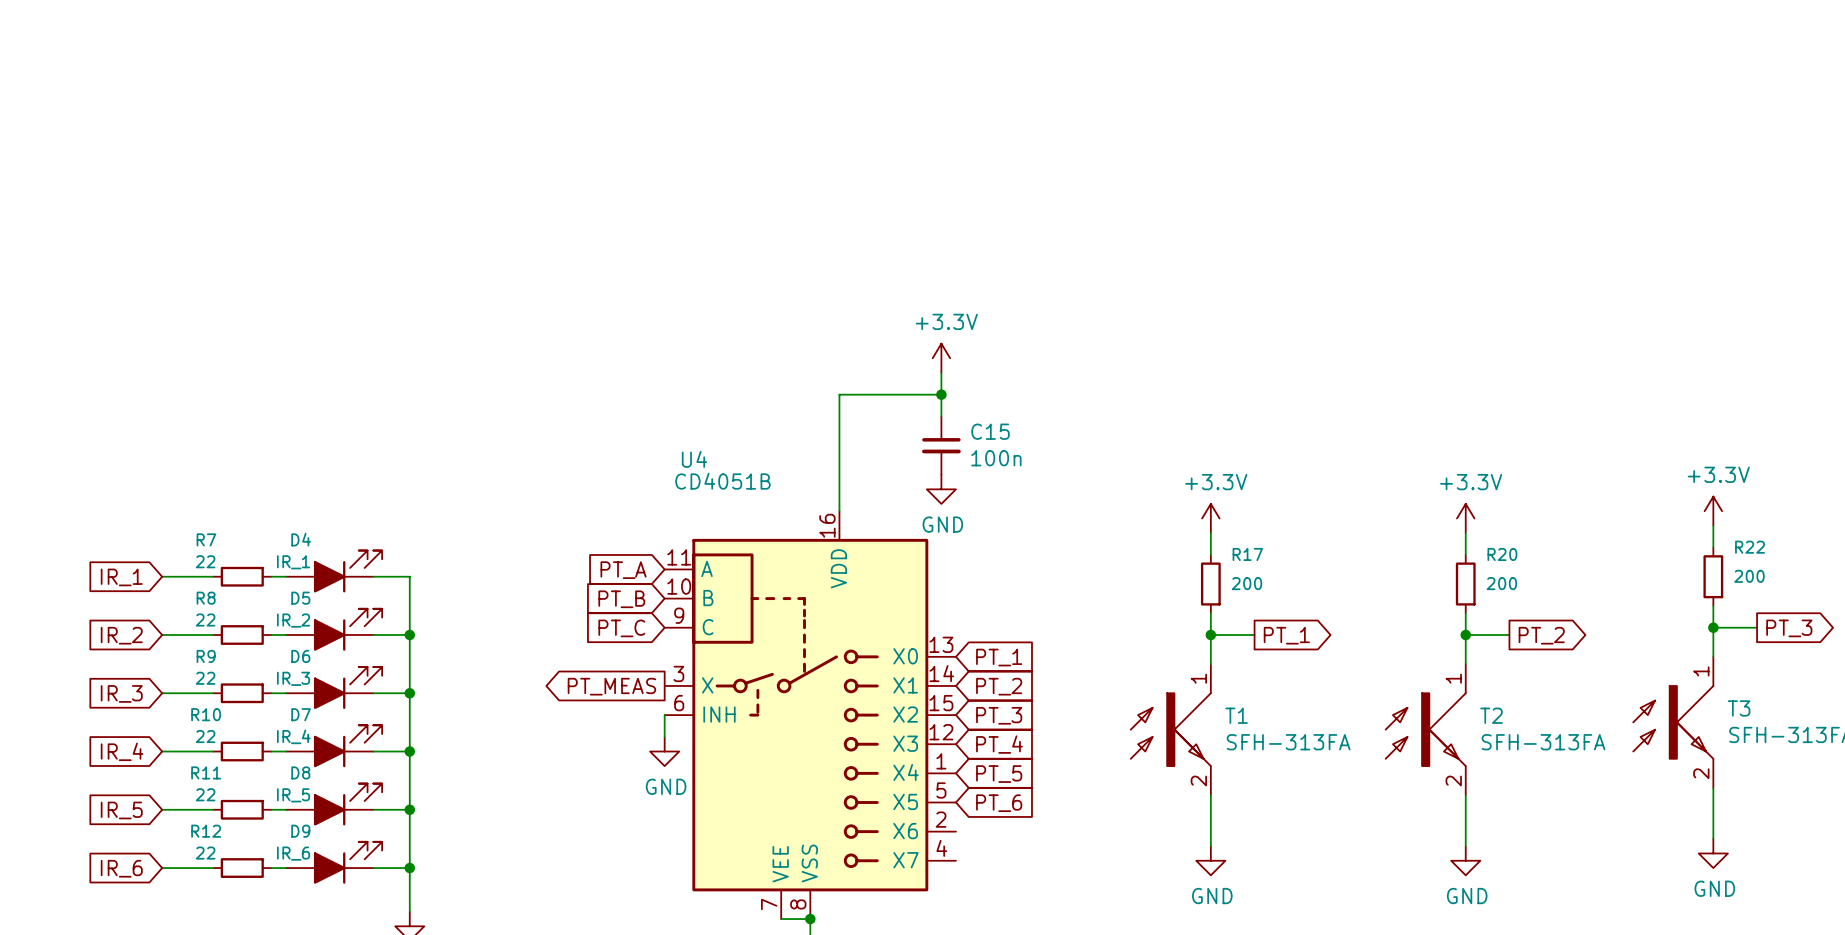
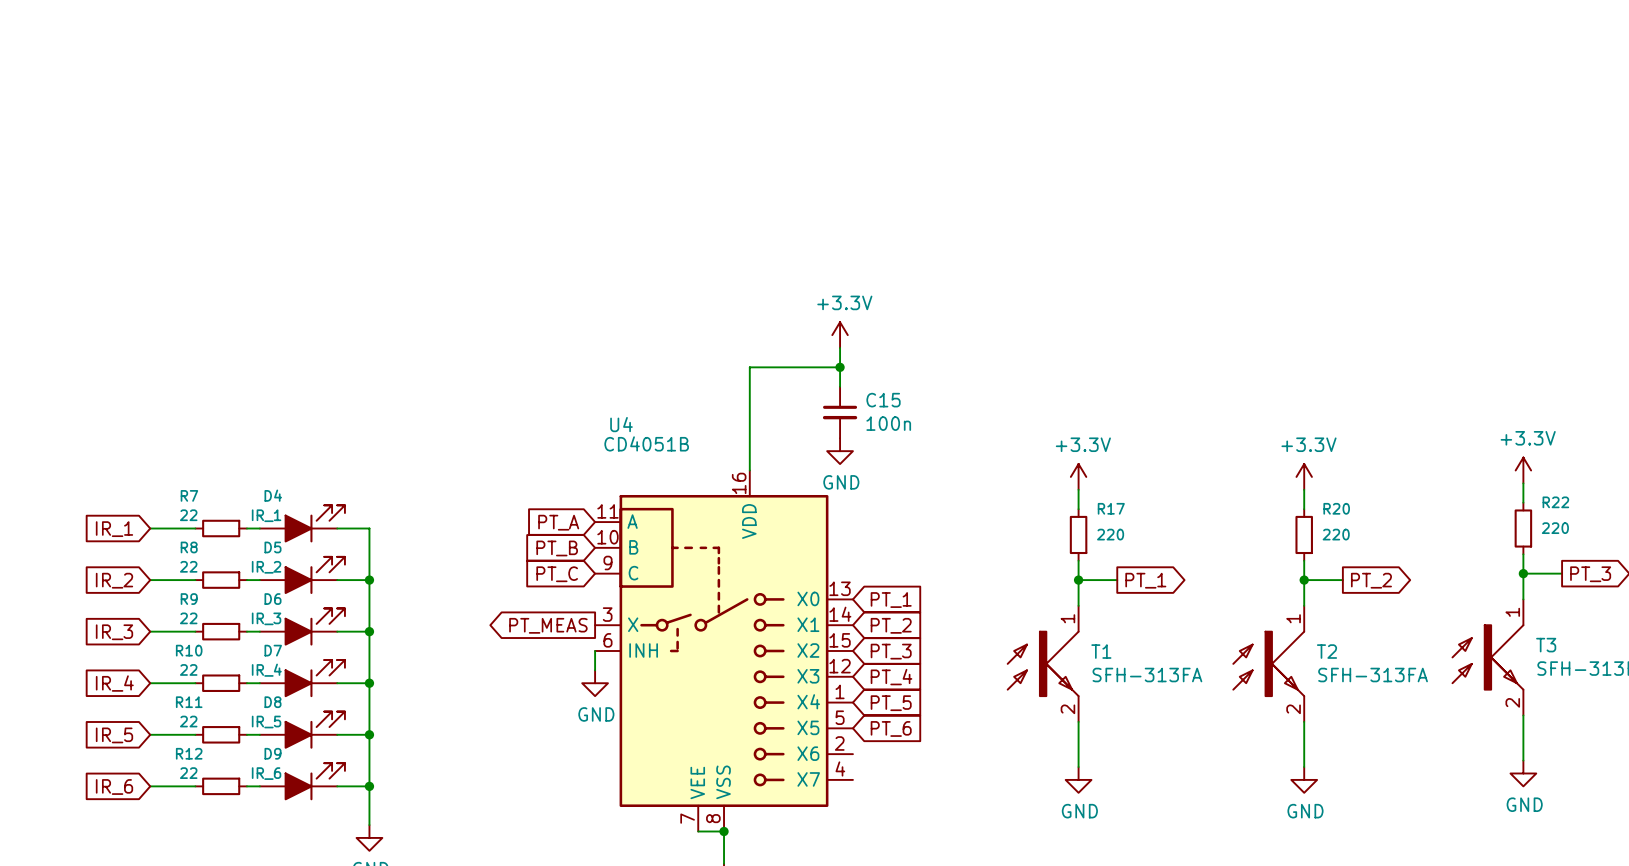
R22 value: 200 (1749, 576) -> 220 (1555, 528)
R17 value: 200 (1247, 583) -> 220 (1110, 534)
R20 value: 200 (1501, 583) -> 220 (1336, 534)

